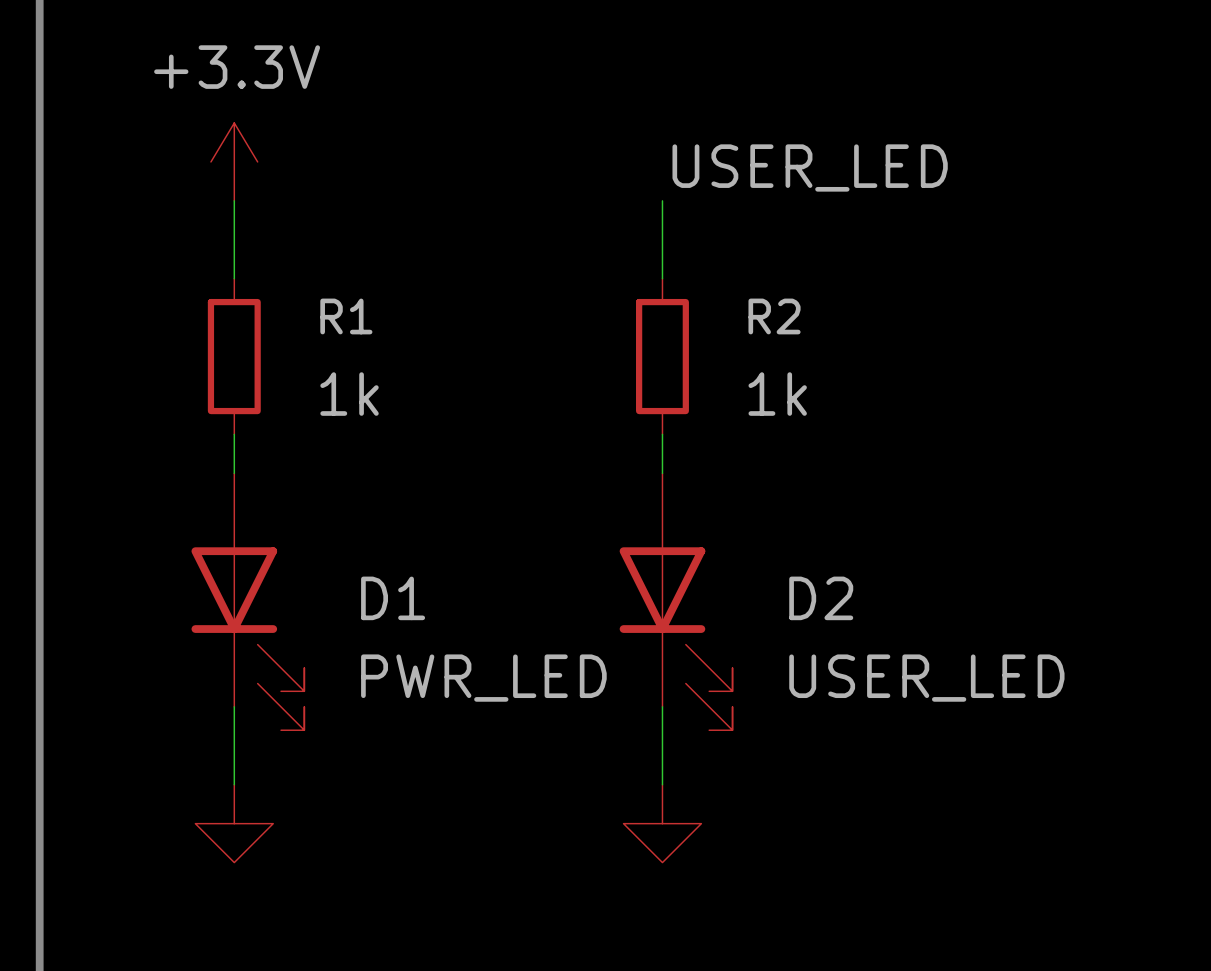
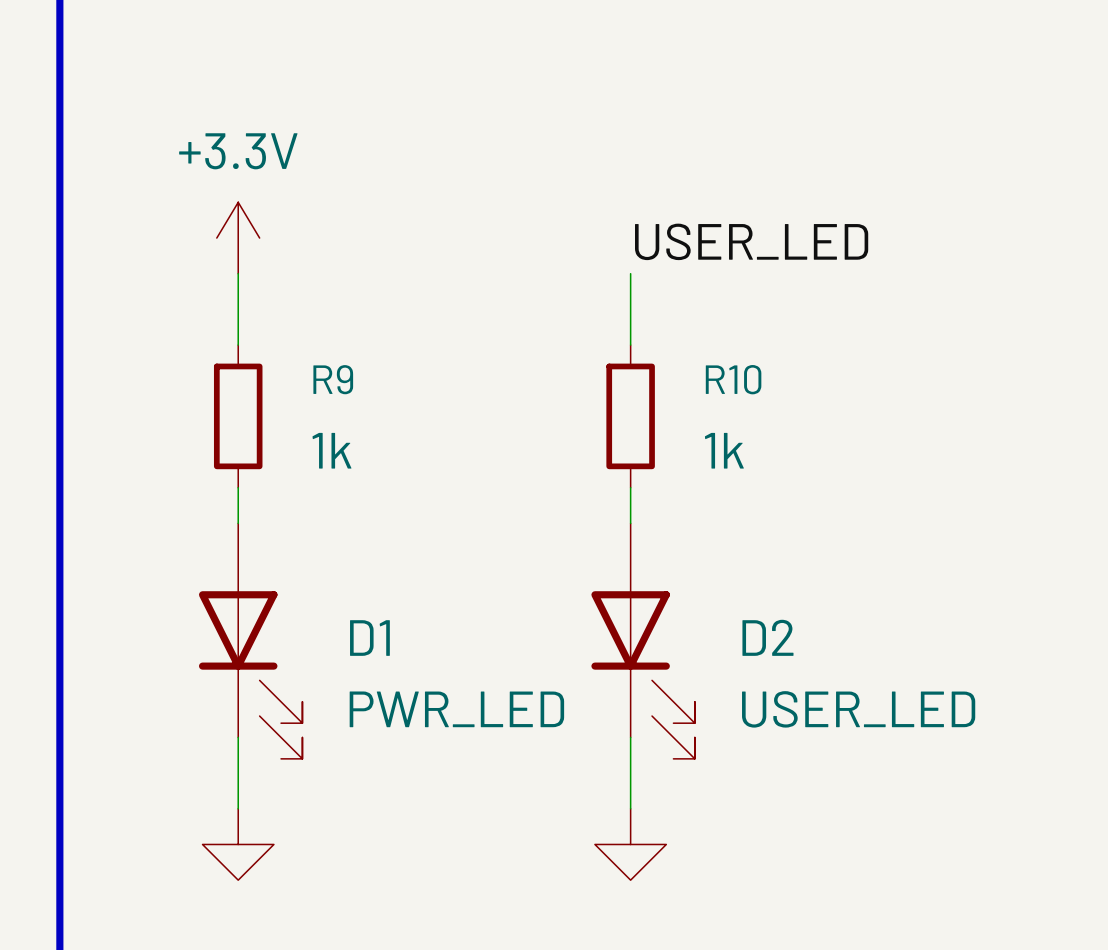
R1 name: R1 (346, 316) -> R9 (333, 379)
R2 name: R2 (774, 316) -> R10 (733, 379)

